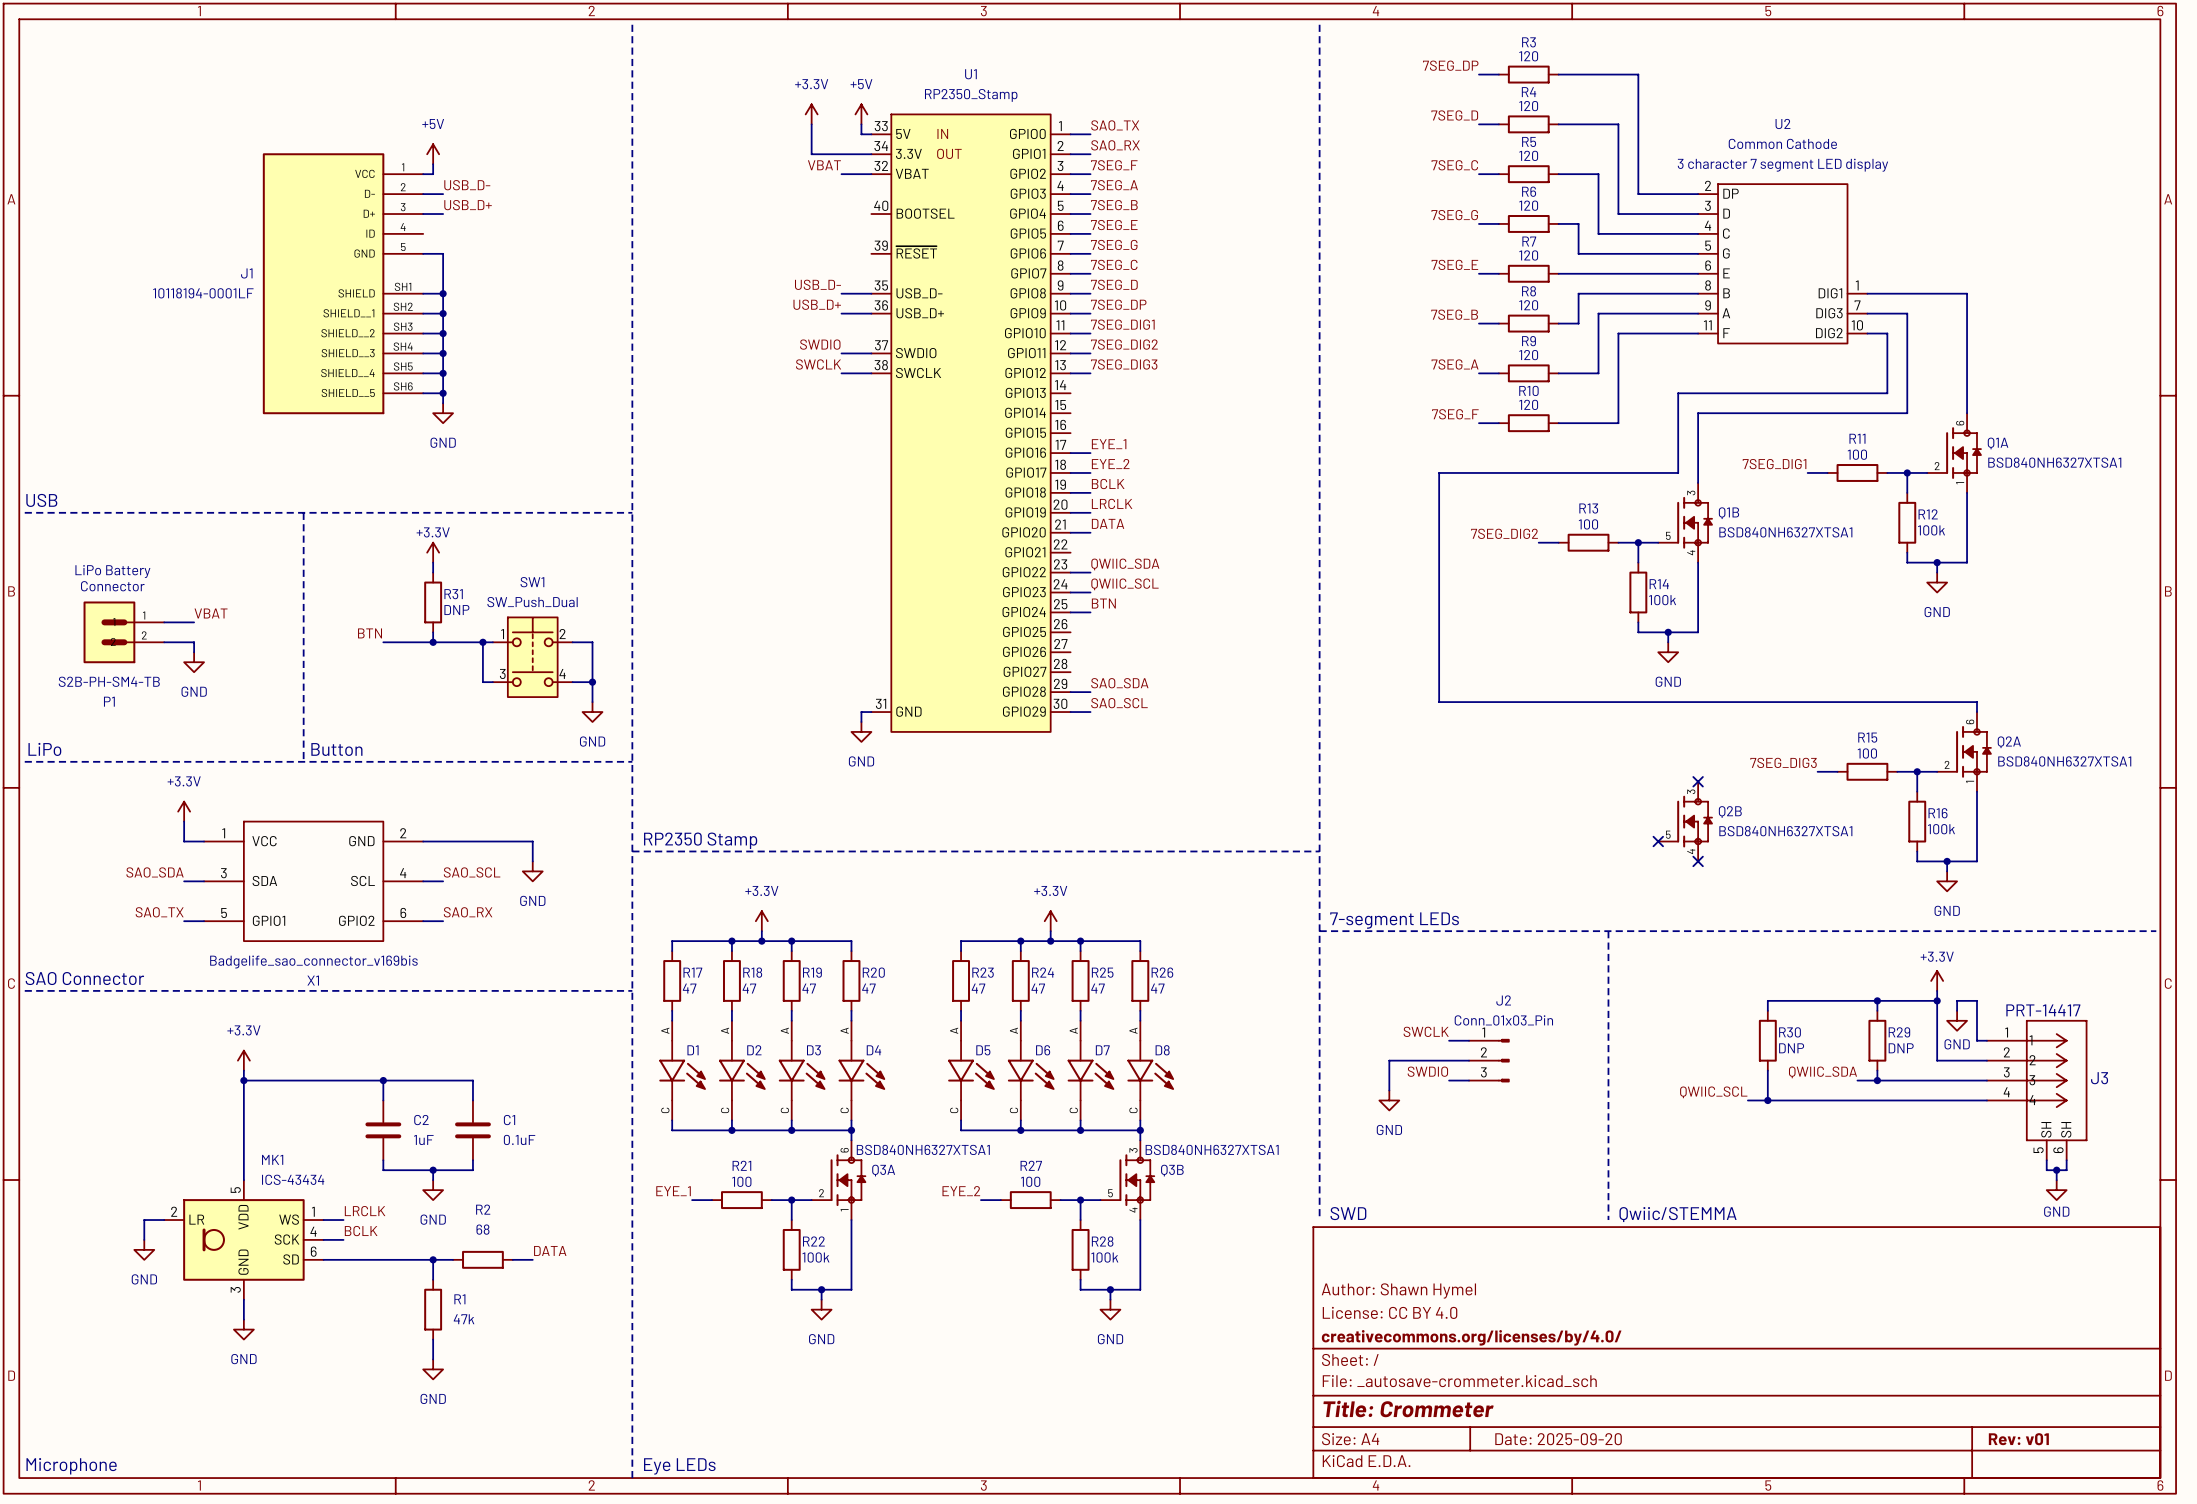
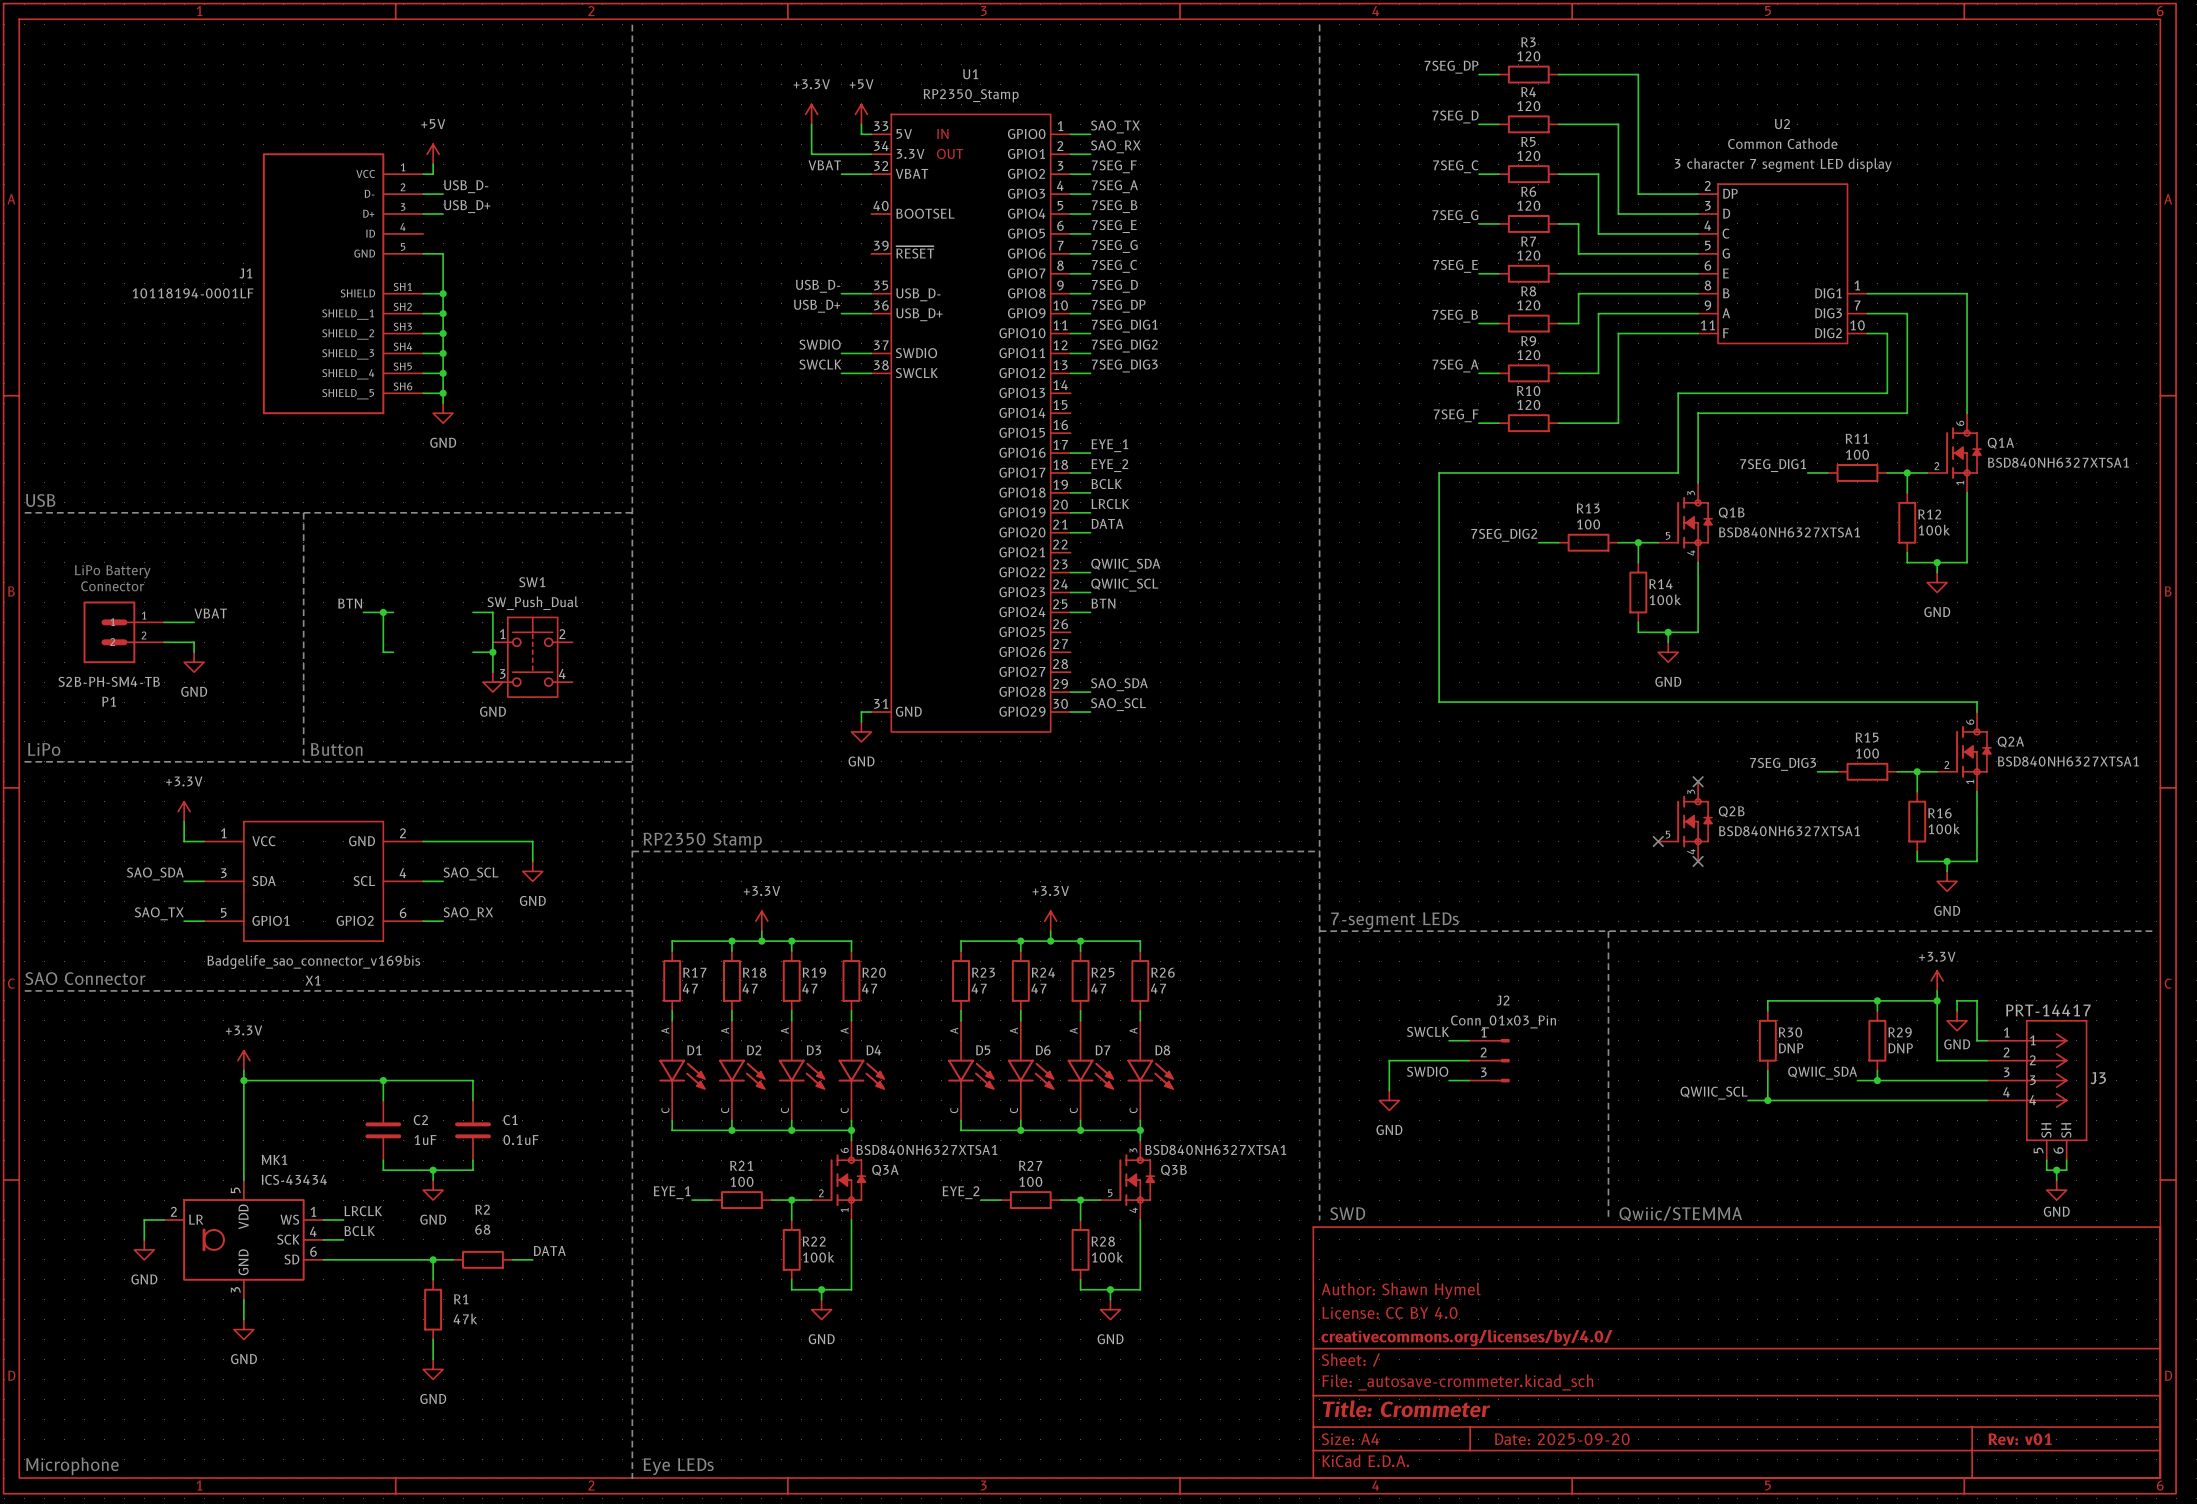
power symbol: +3.3V (433, 552) -> none
wire: (433, 562) (433, 572) -> none
R31: DNP (433, 602) -> none
wire: none -> (363, 612) (393, 612)
junction: none -> (383, 612)
wire: (433, 632) (433, 642) -> none
label position: BTN (370, 633) -> BTN (350, 603)
wire: (383, 642) (492, 642) -> none
junction: (433, 642) -> none
wire: (482, 642) (482, 682) (492, 682) -> (383, 612) (383, 652) (393, 652)
junction position: (482, 642) -> (492, 652)
wire: (572, 642) (592, 642) (592, 702) -> (472, 612) (492, 612) (492, 672)
wire: (572, 682) (592, 682) -> (472, 652) (492, 652)
junction: (592, 682) -> none
power symbol position: GND (592, 712) -> GND (492, 682)

